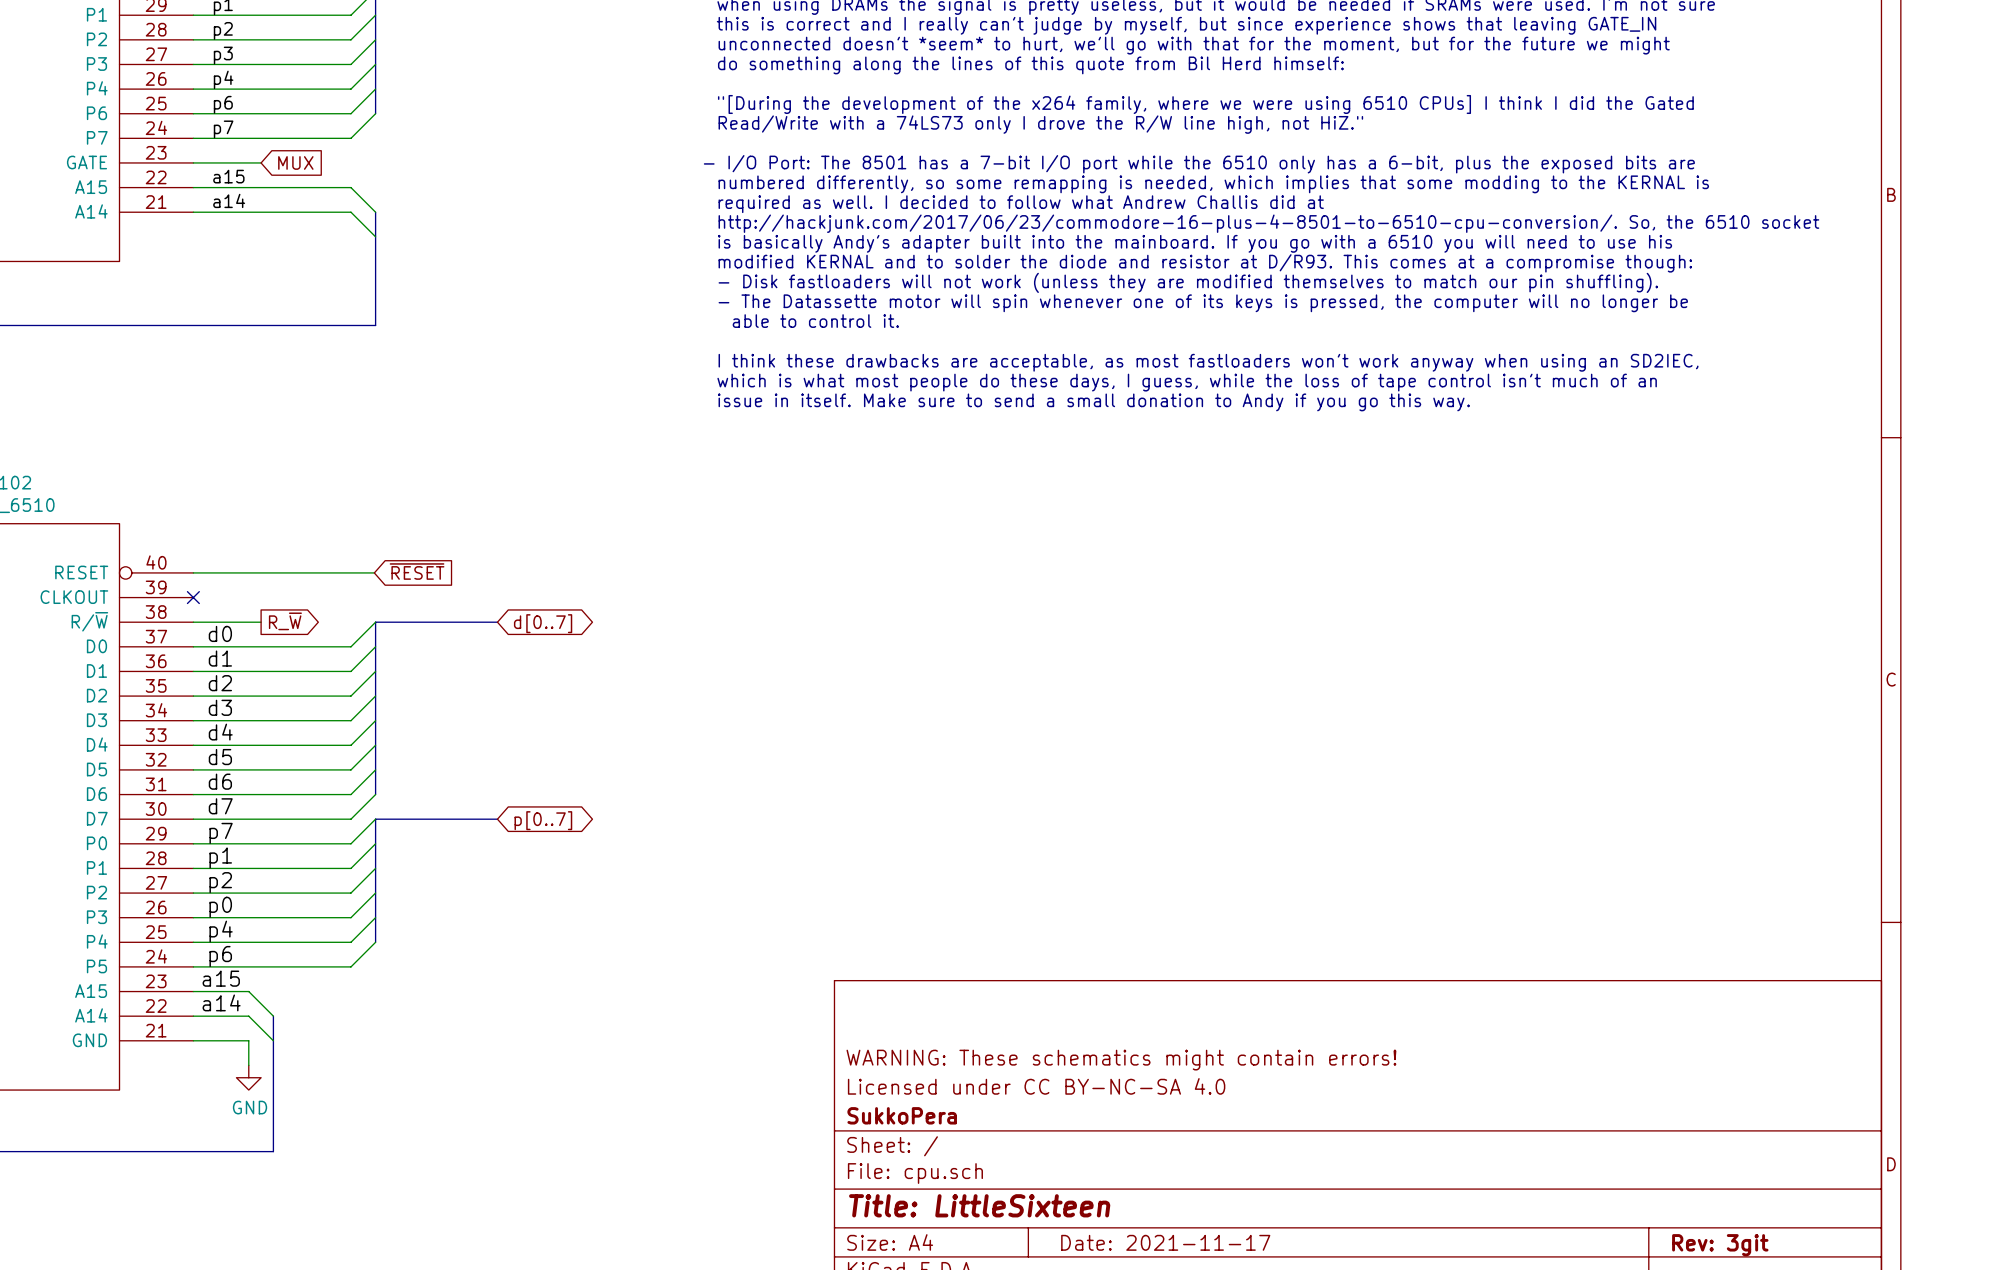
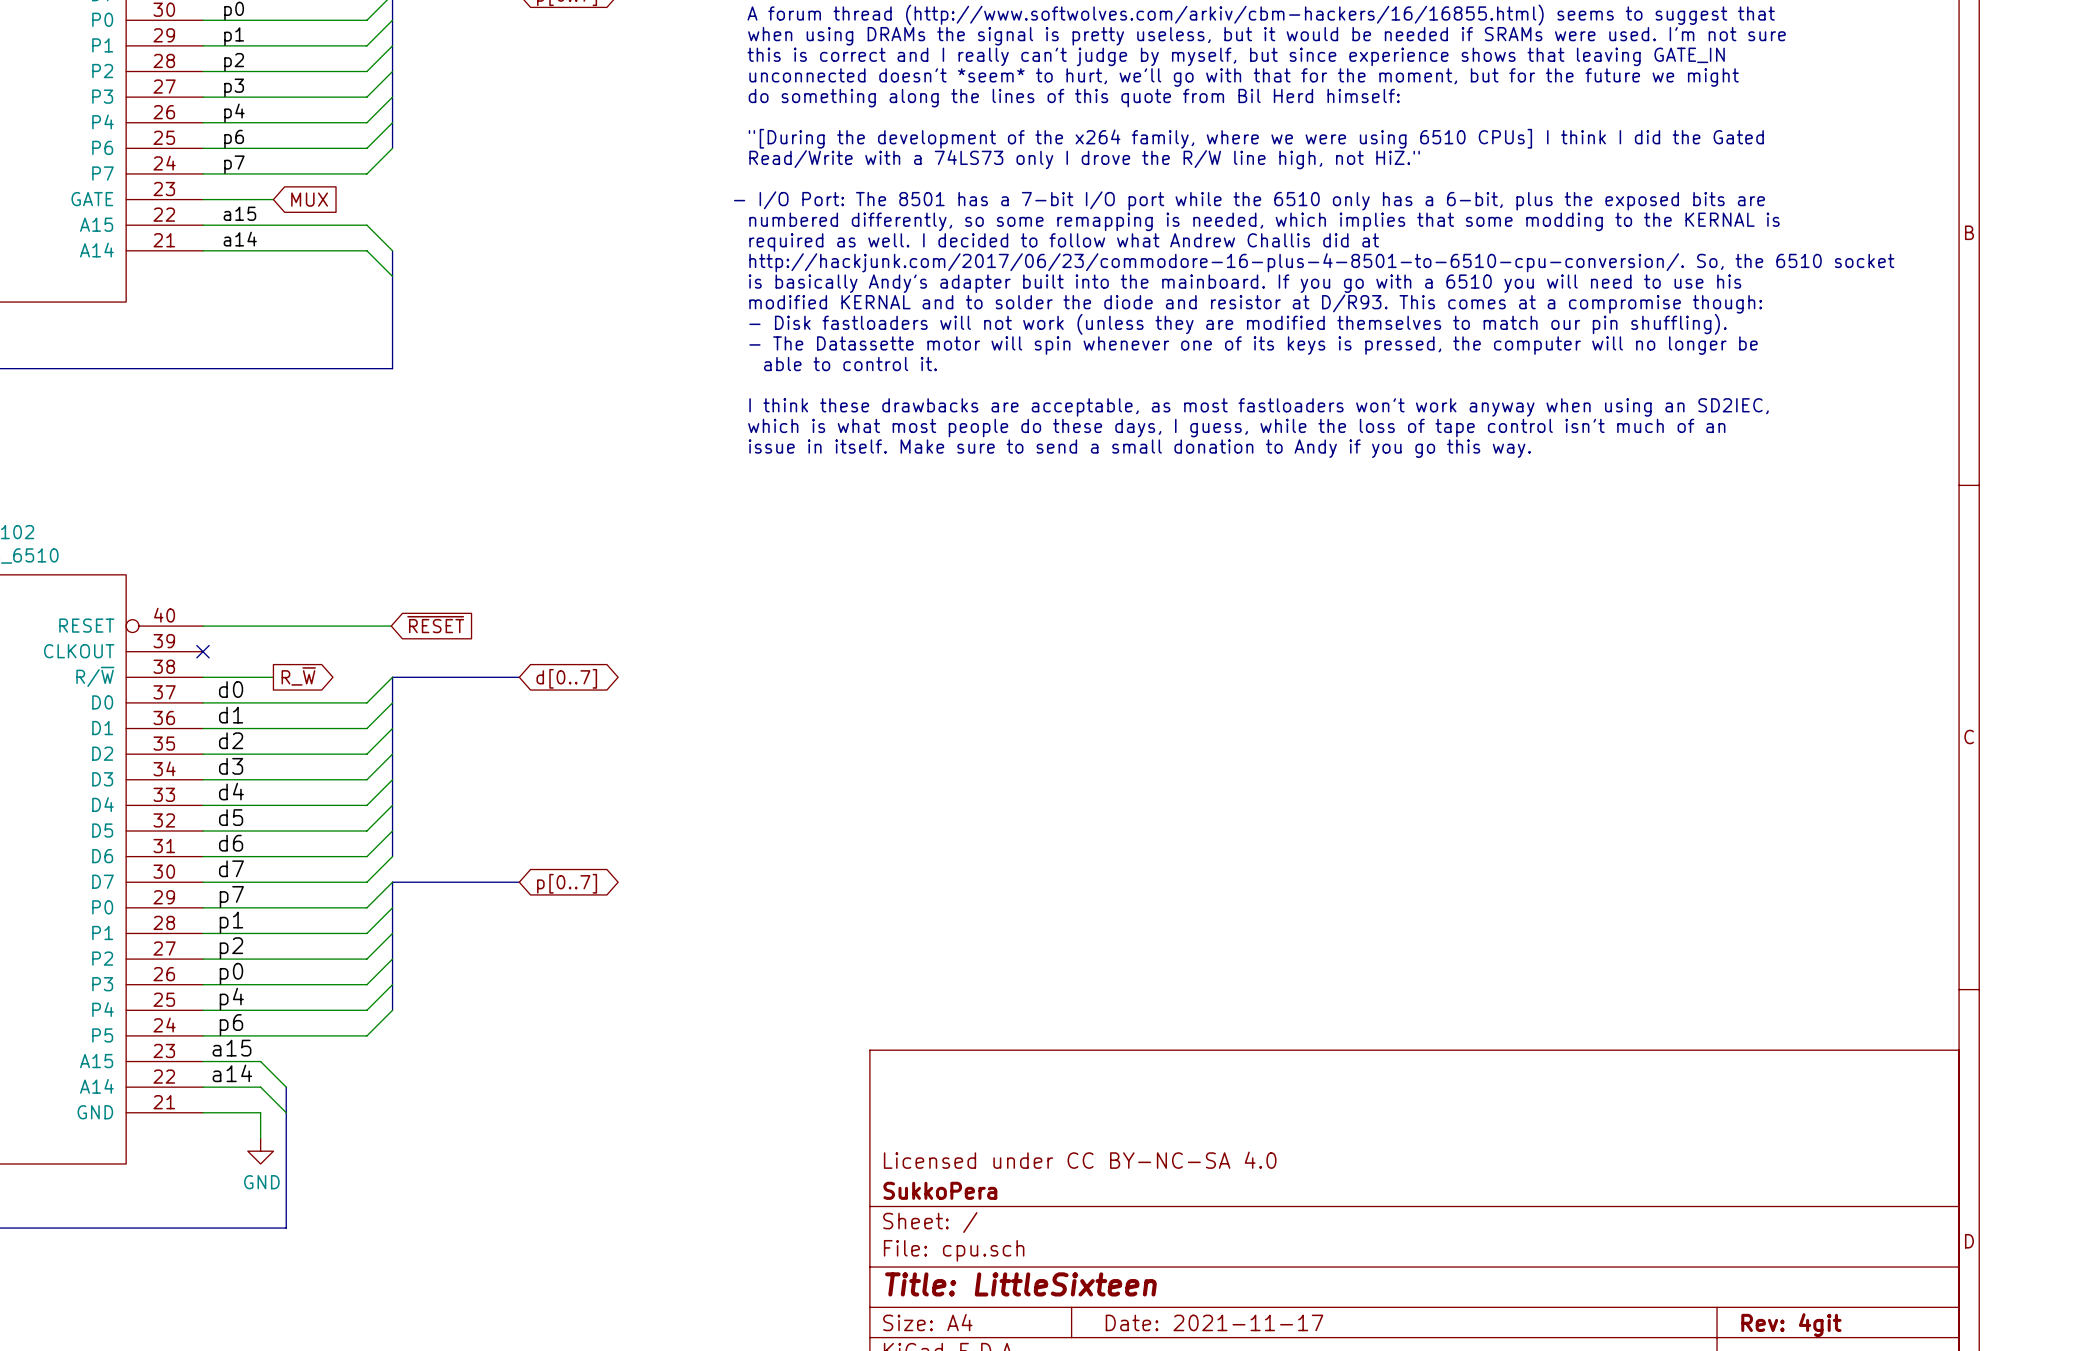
title block: WARNING: These schematics might contain errors! (1121, 1060) -> none
title block: Rev: 3git (1720, 1245) -> Rev: 4git (1791, 1325)

